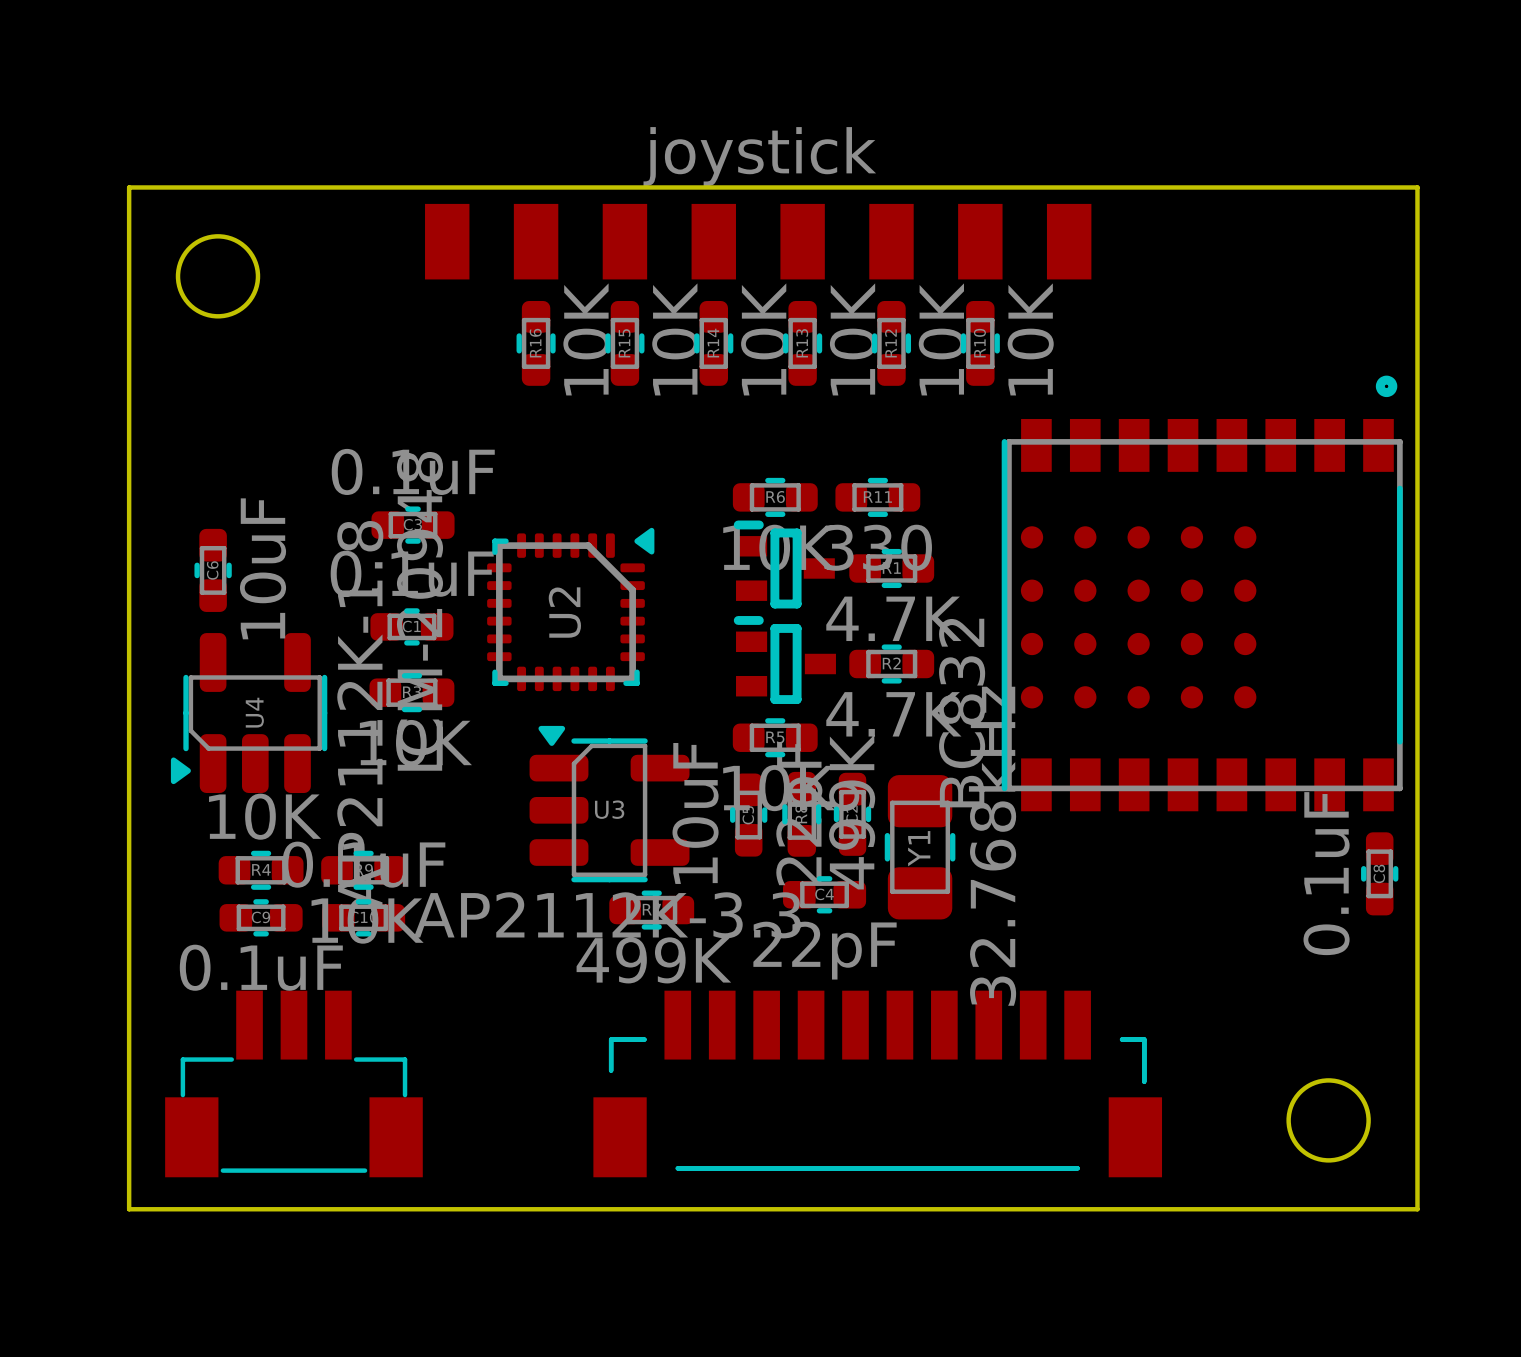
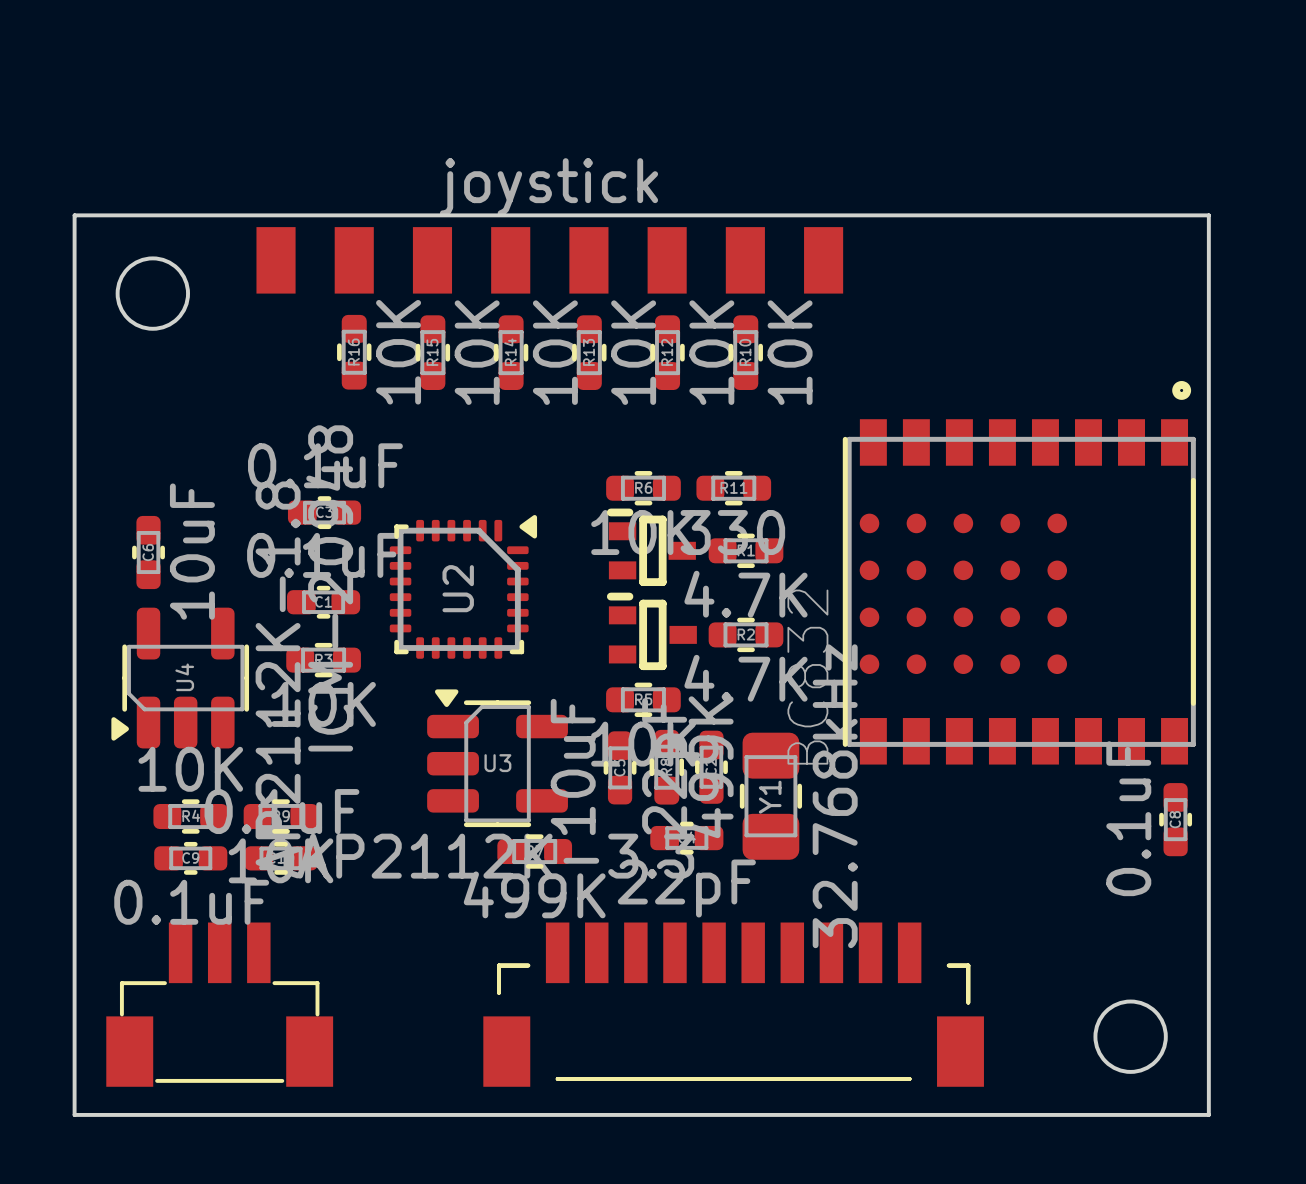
part position: (758, 241) -> (549, 260)
R16: none -> 10K (354, 352)
R16 name: R16 (535, 343) -> R15 (432, 352)
R15 name: R15 (624, 343) -> R14 (510, 352)
R14 name: R14 (713, 343) -> R13 (588, 352)
R13 name: R13 (802, 343) -> R12 (667, 352)
R12 name: R12 (890, 343) -> R10 (745, 352)
R10: 10K (980, 343) -> none

